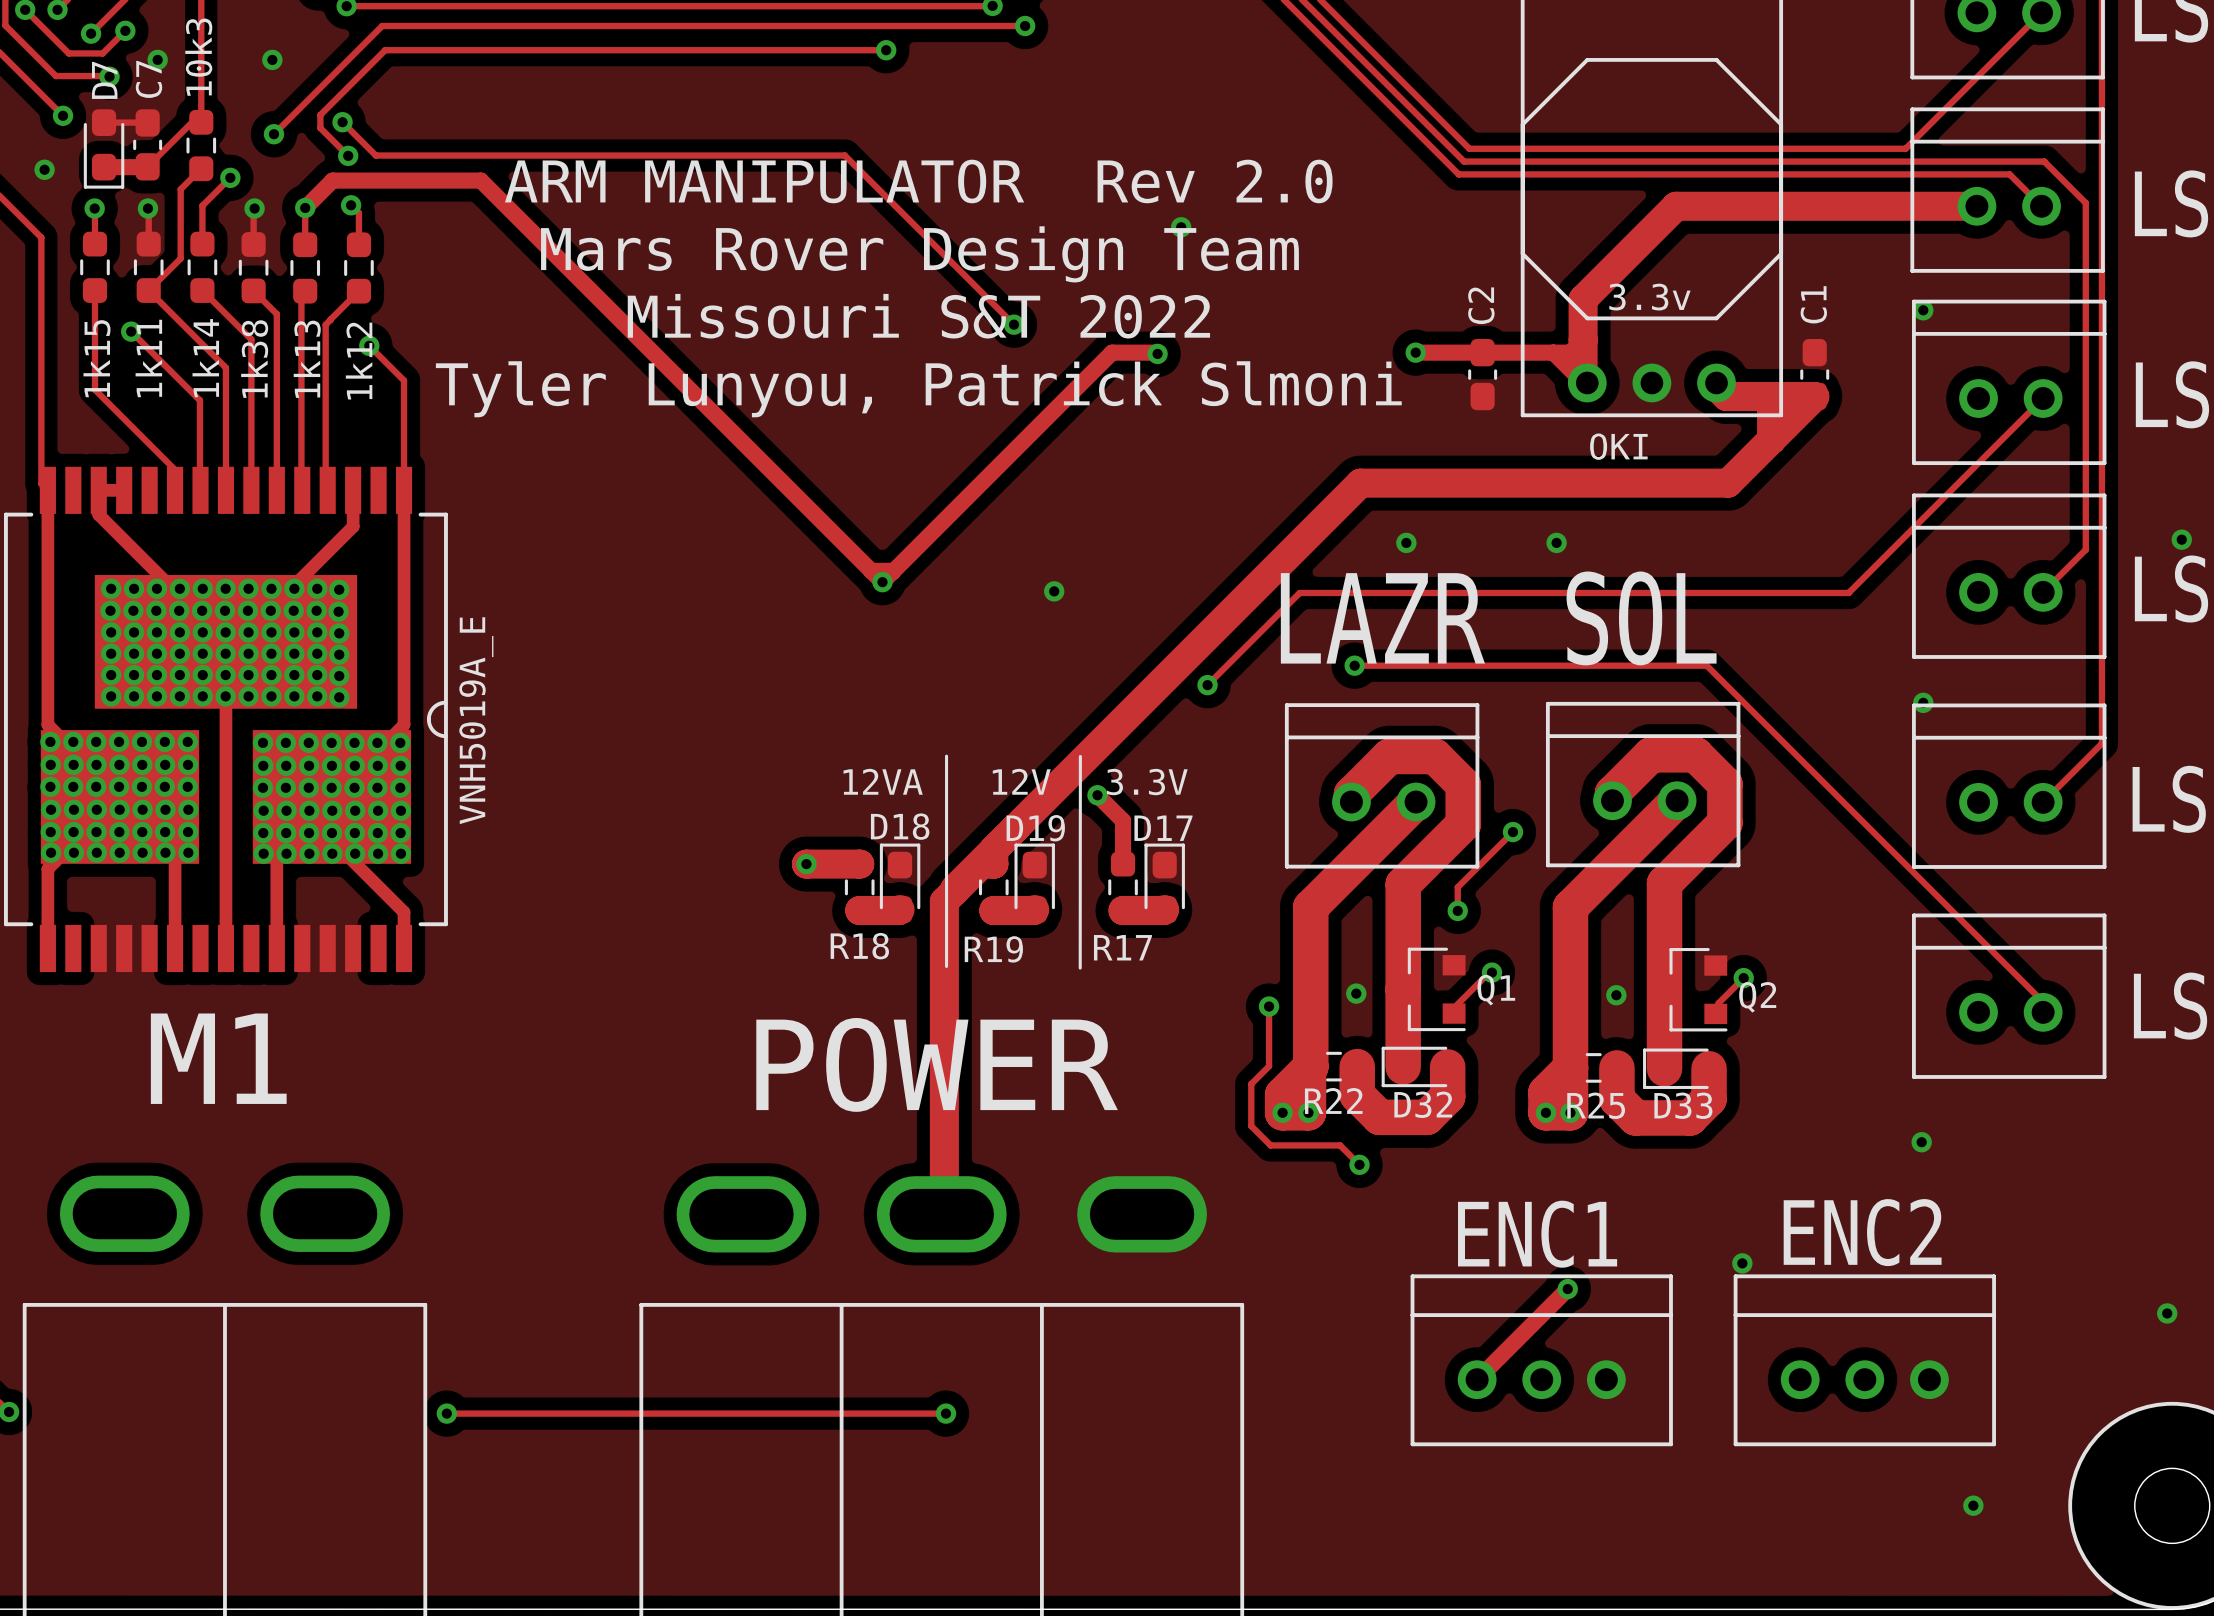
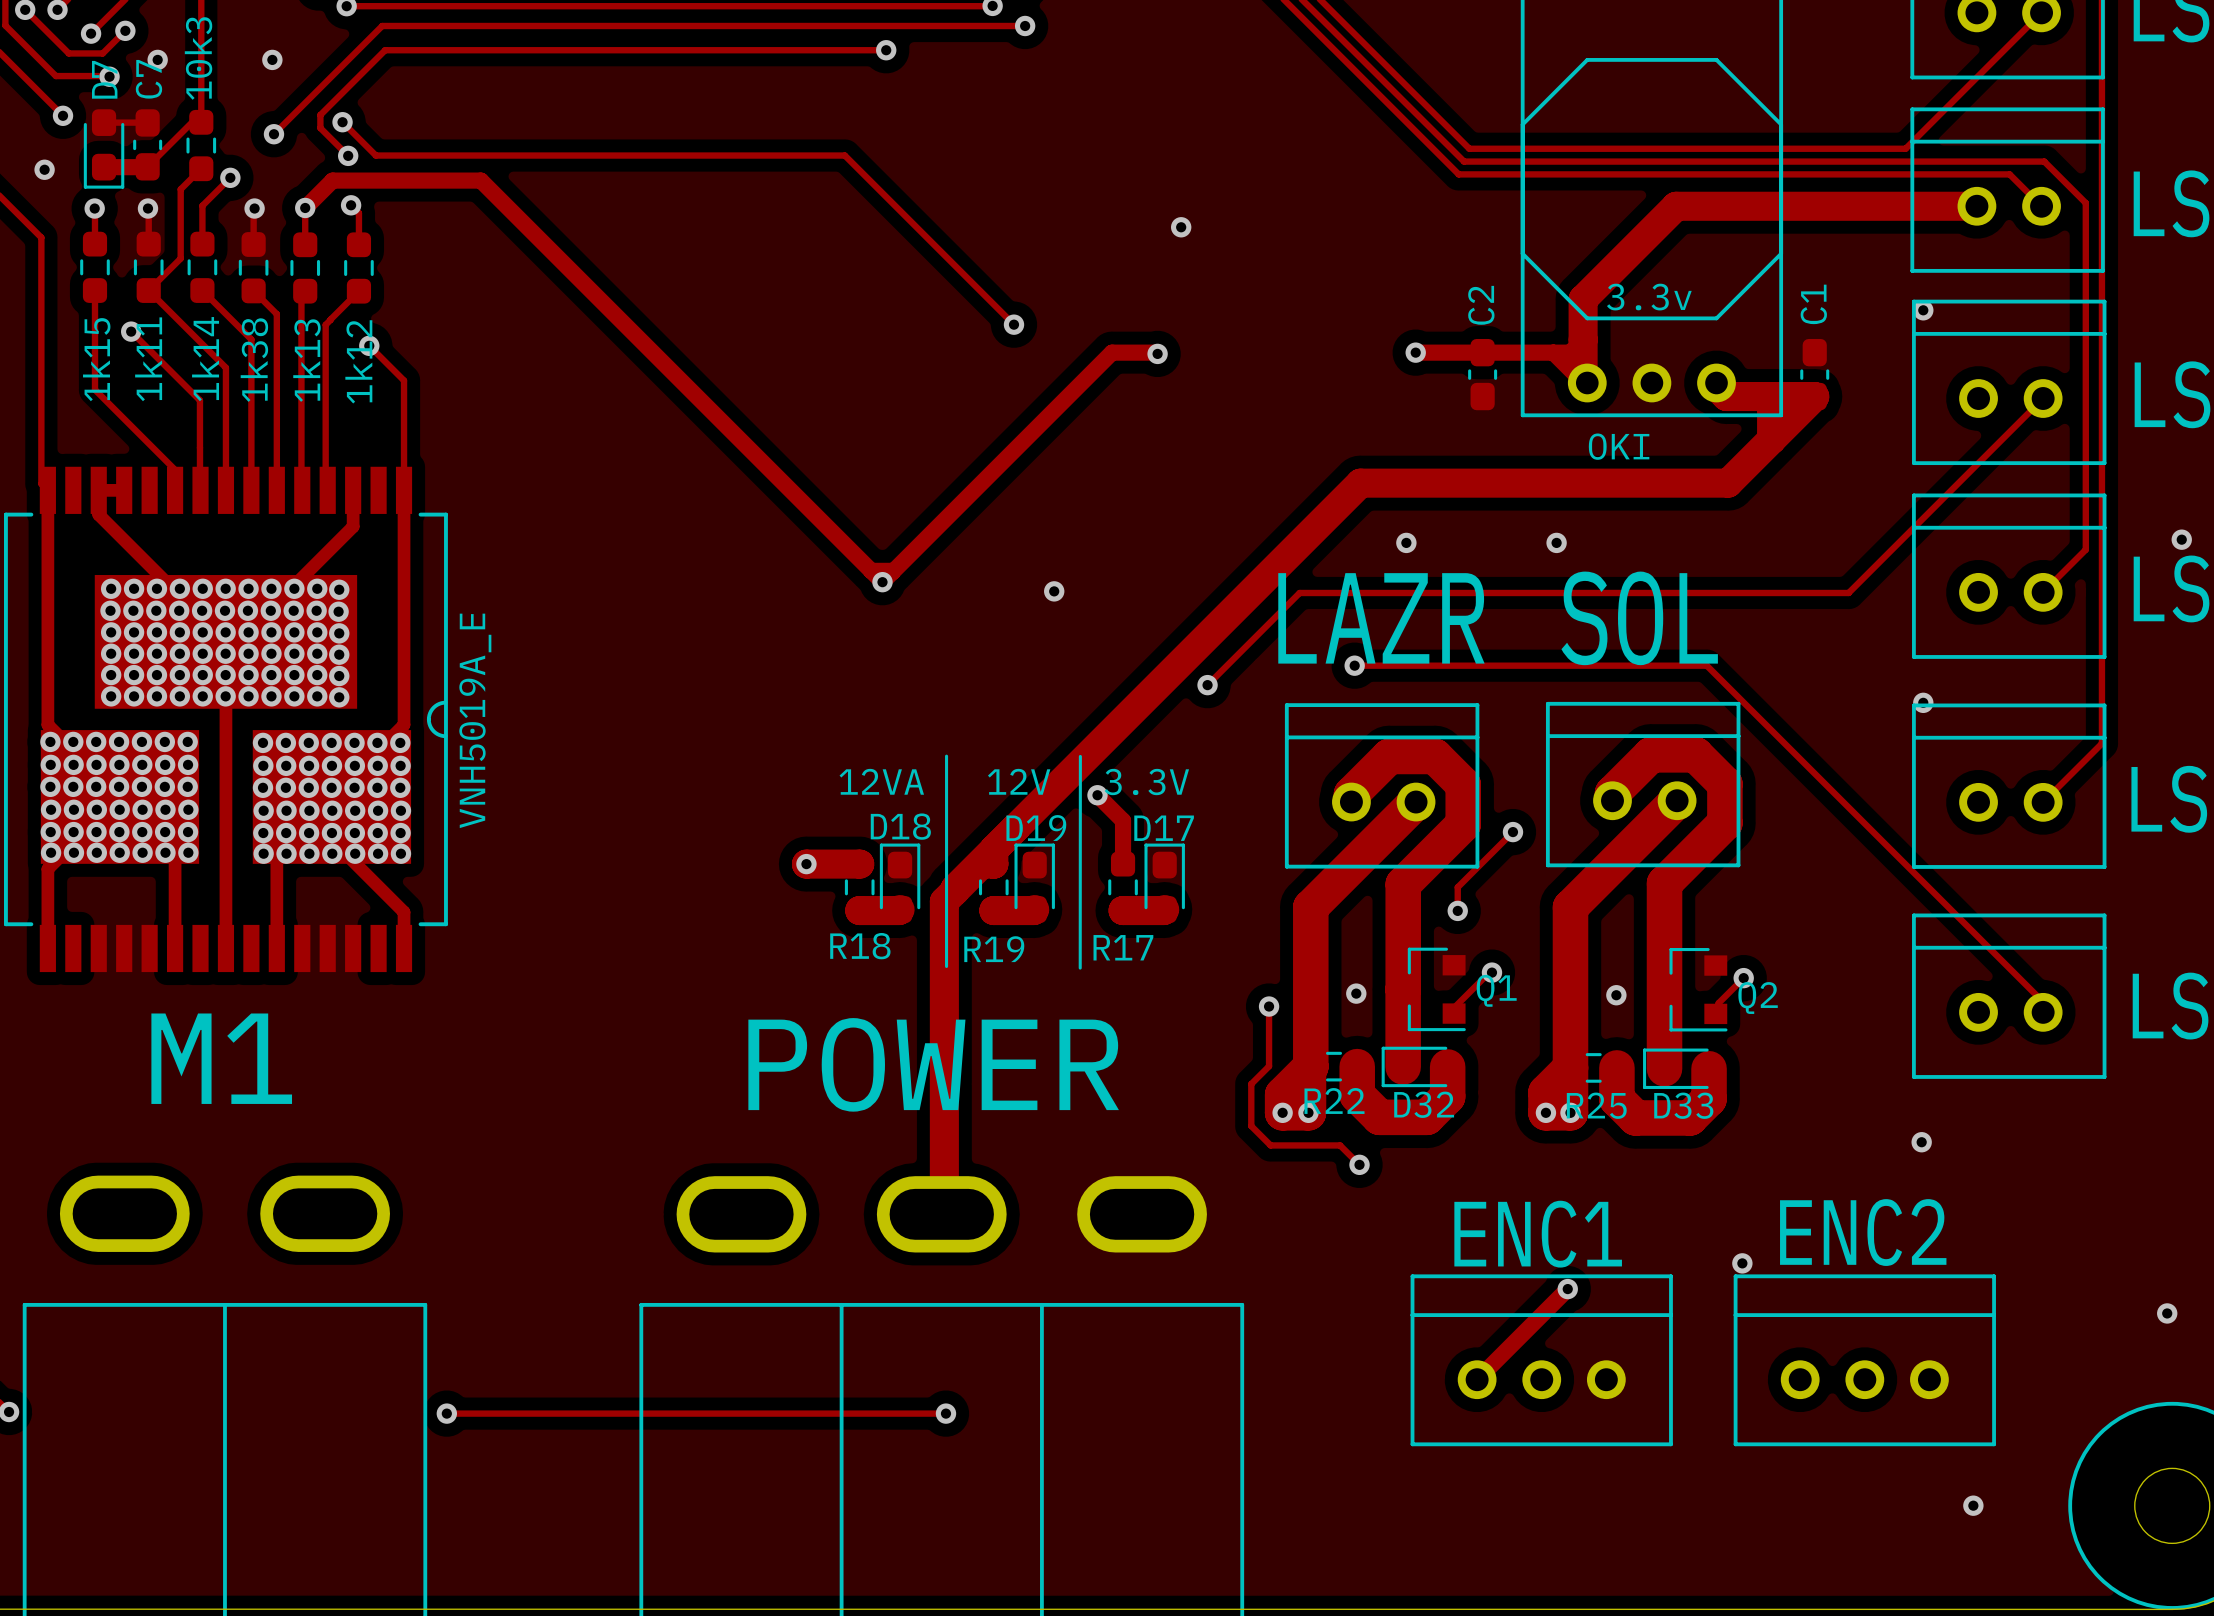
text: ARM MANIPULATOR Rev 2.0 (918, 181) -> none
text: Mars Rover Design Team (919, 254) -> none
text: Missouri S&T 2022 (918, 316) -> none
text: Tyler Lunyou, Patrick Slmoni (918, 389) -> none

